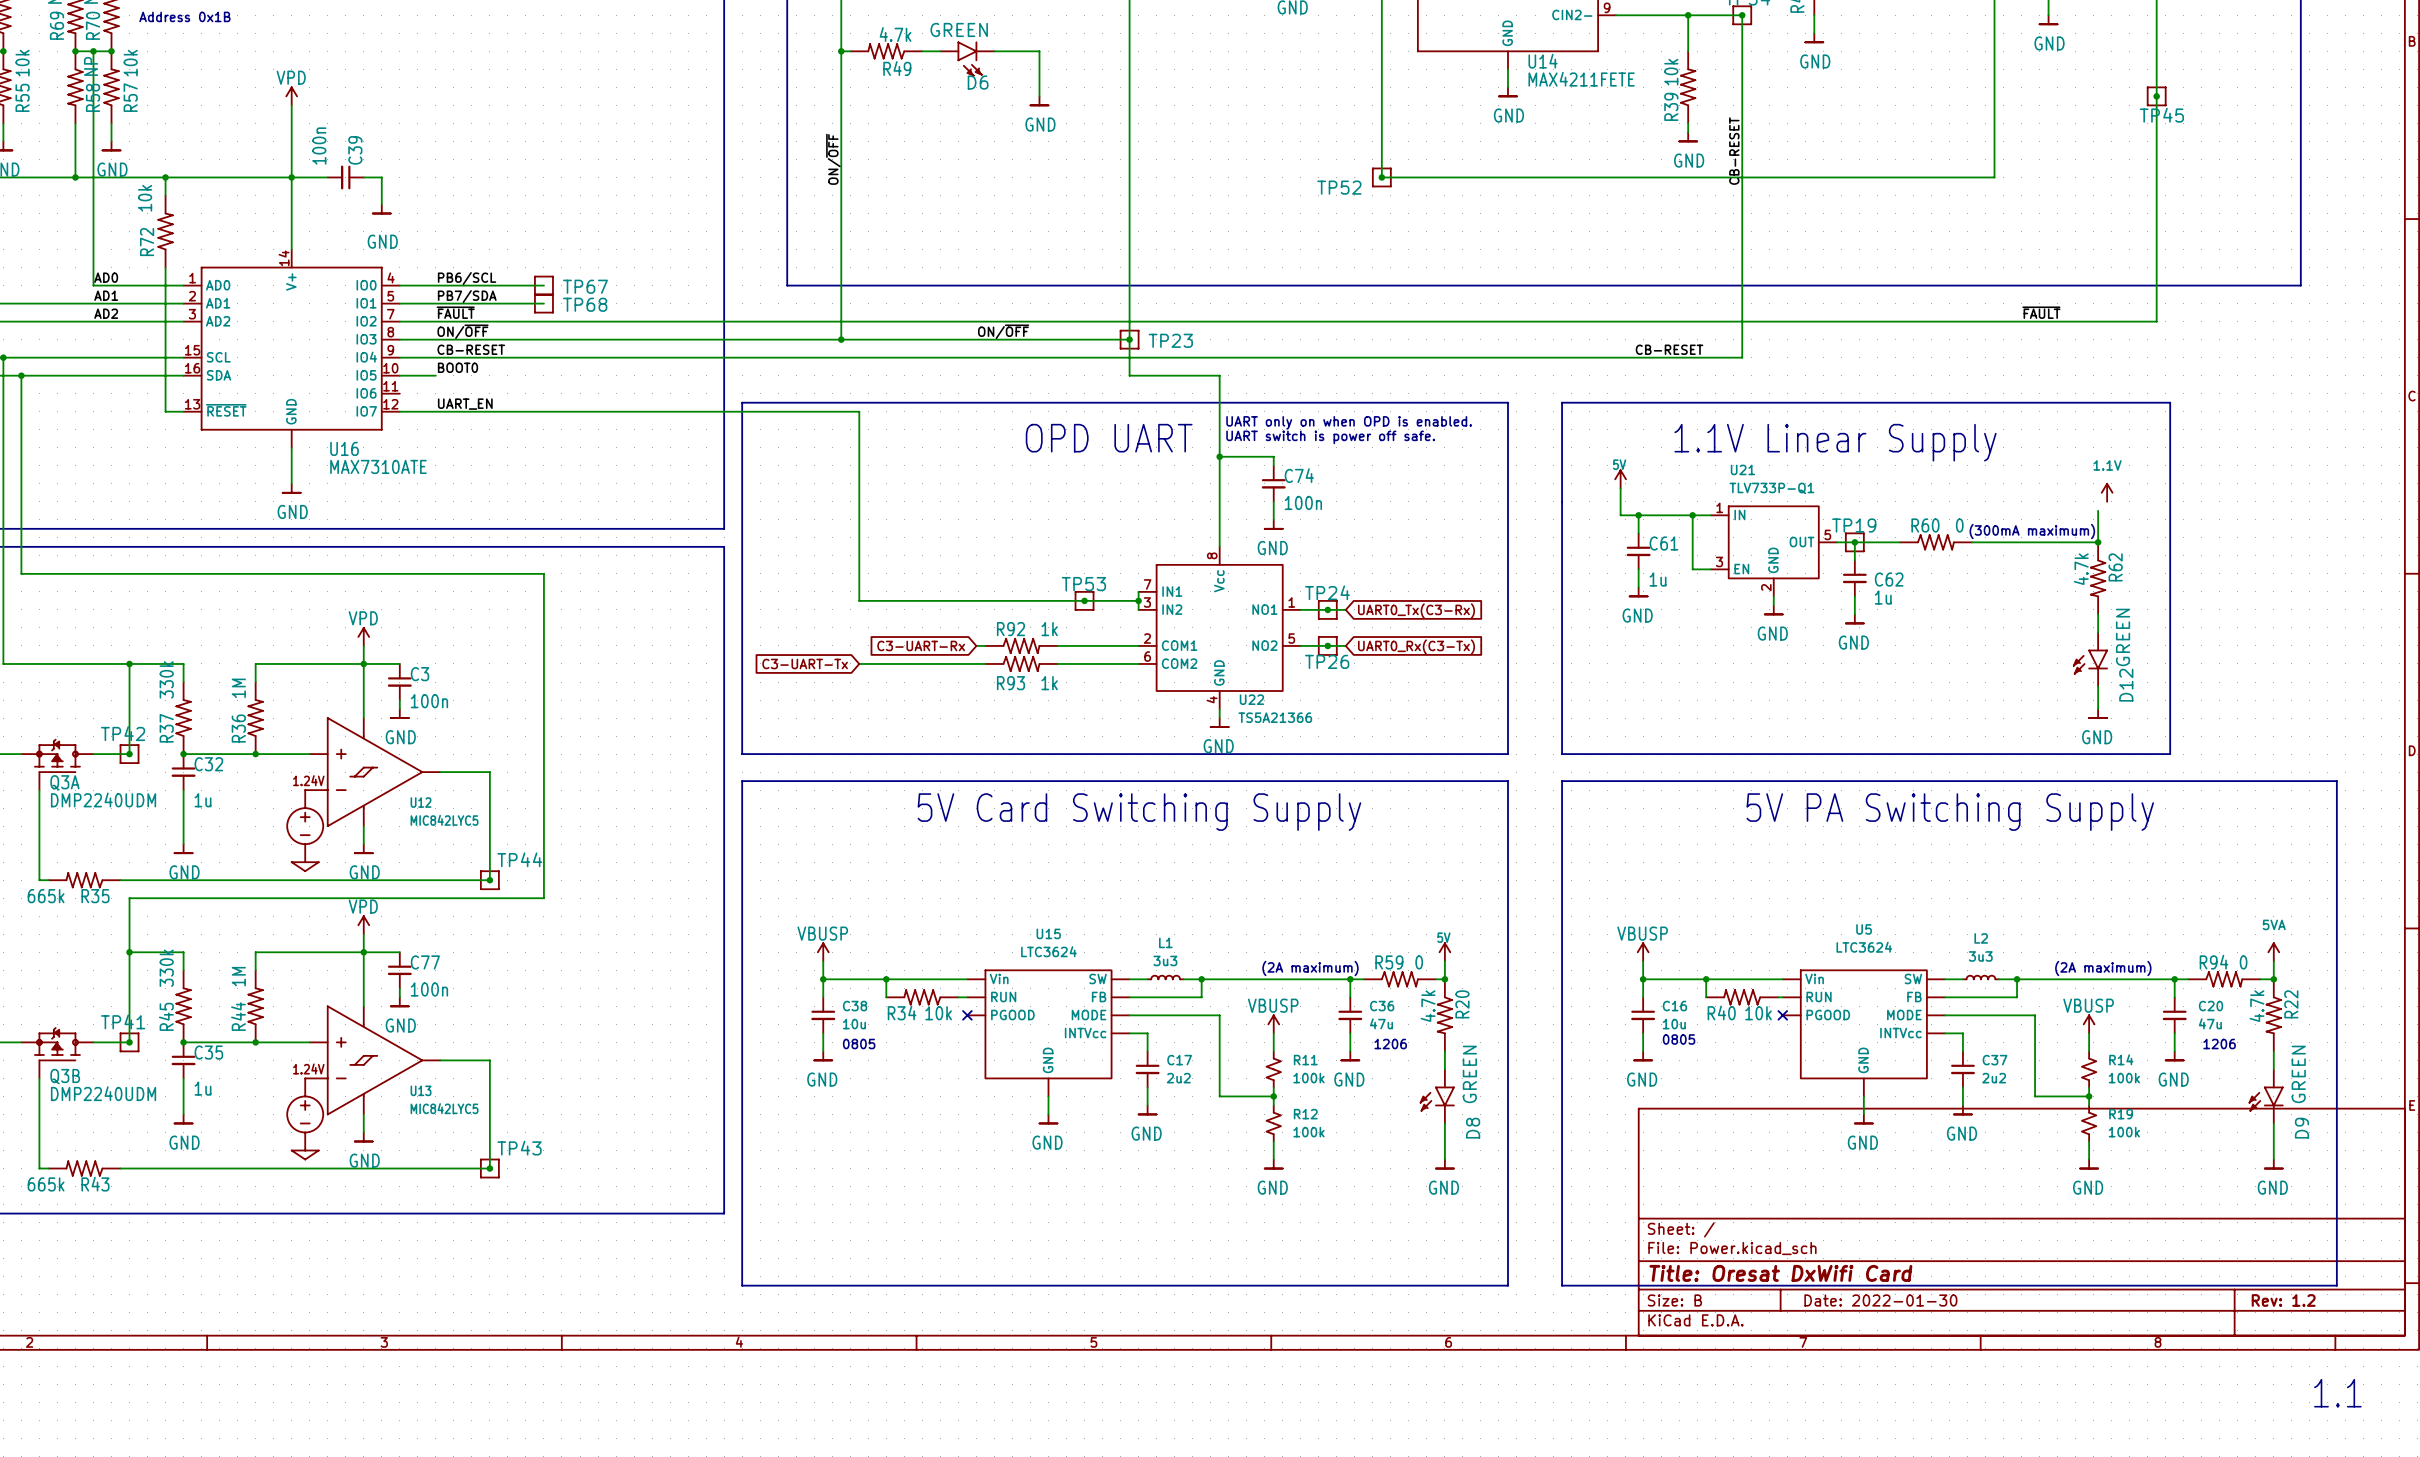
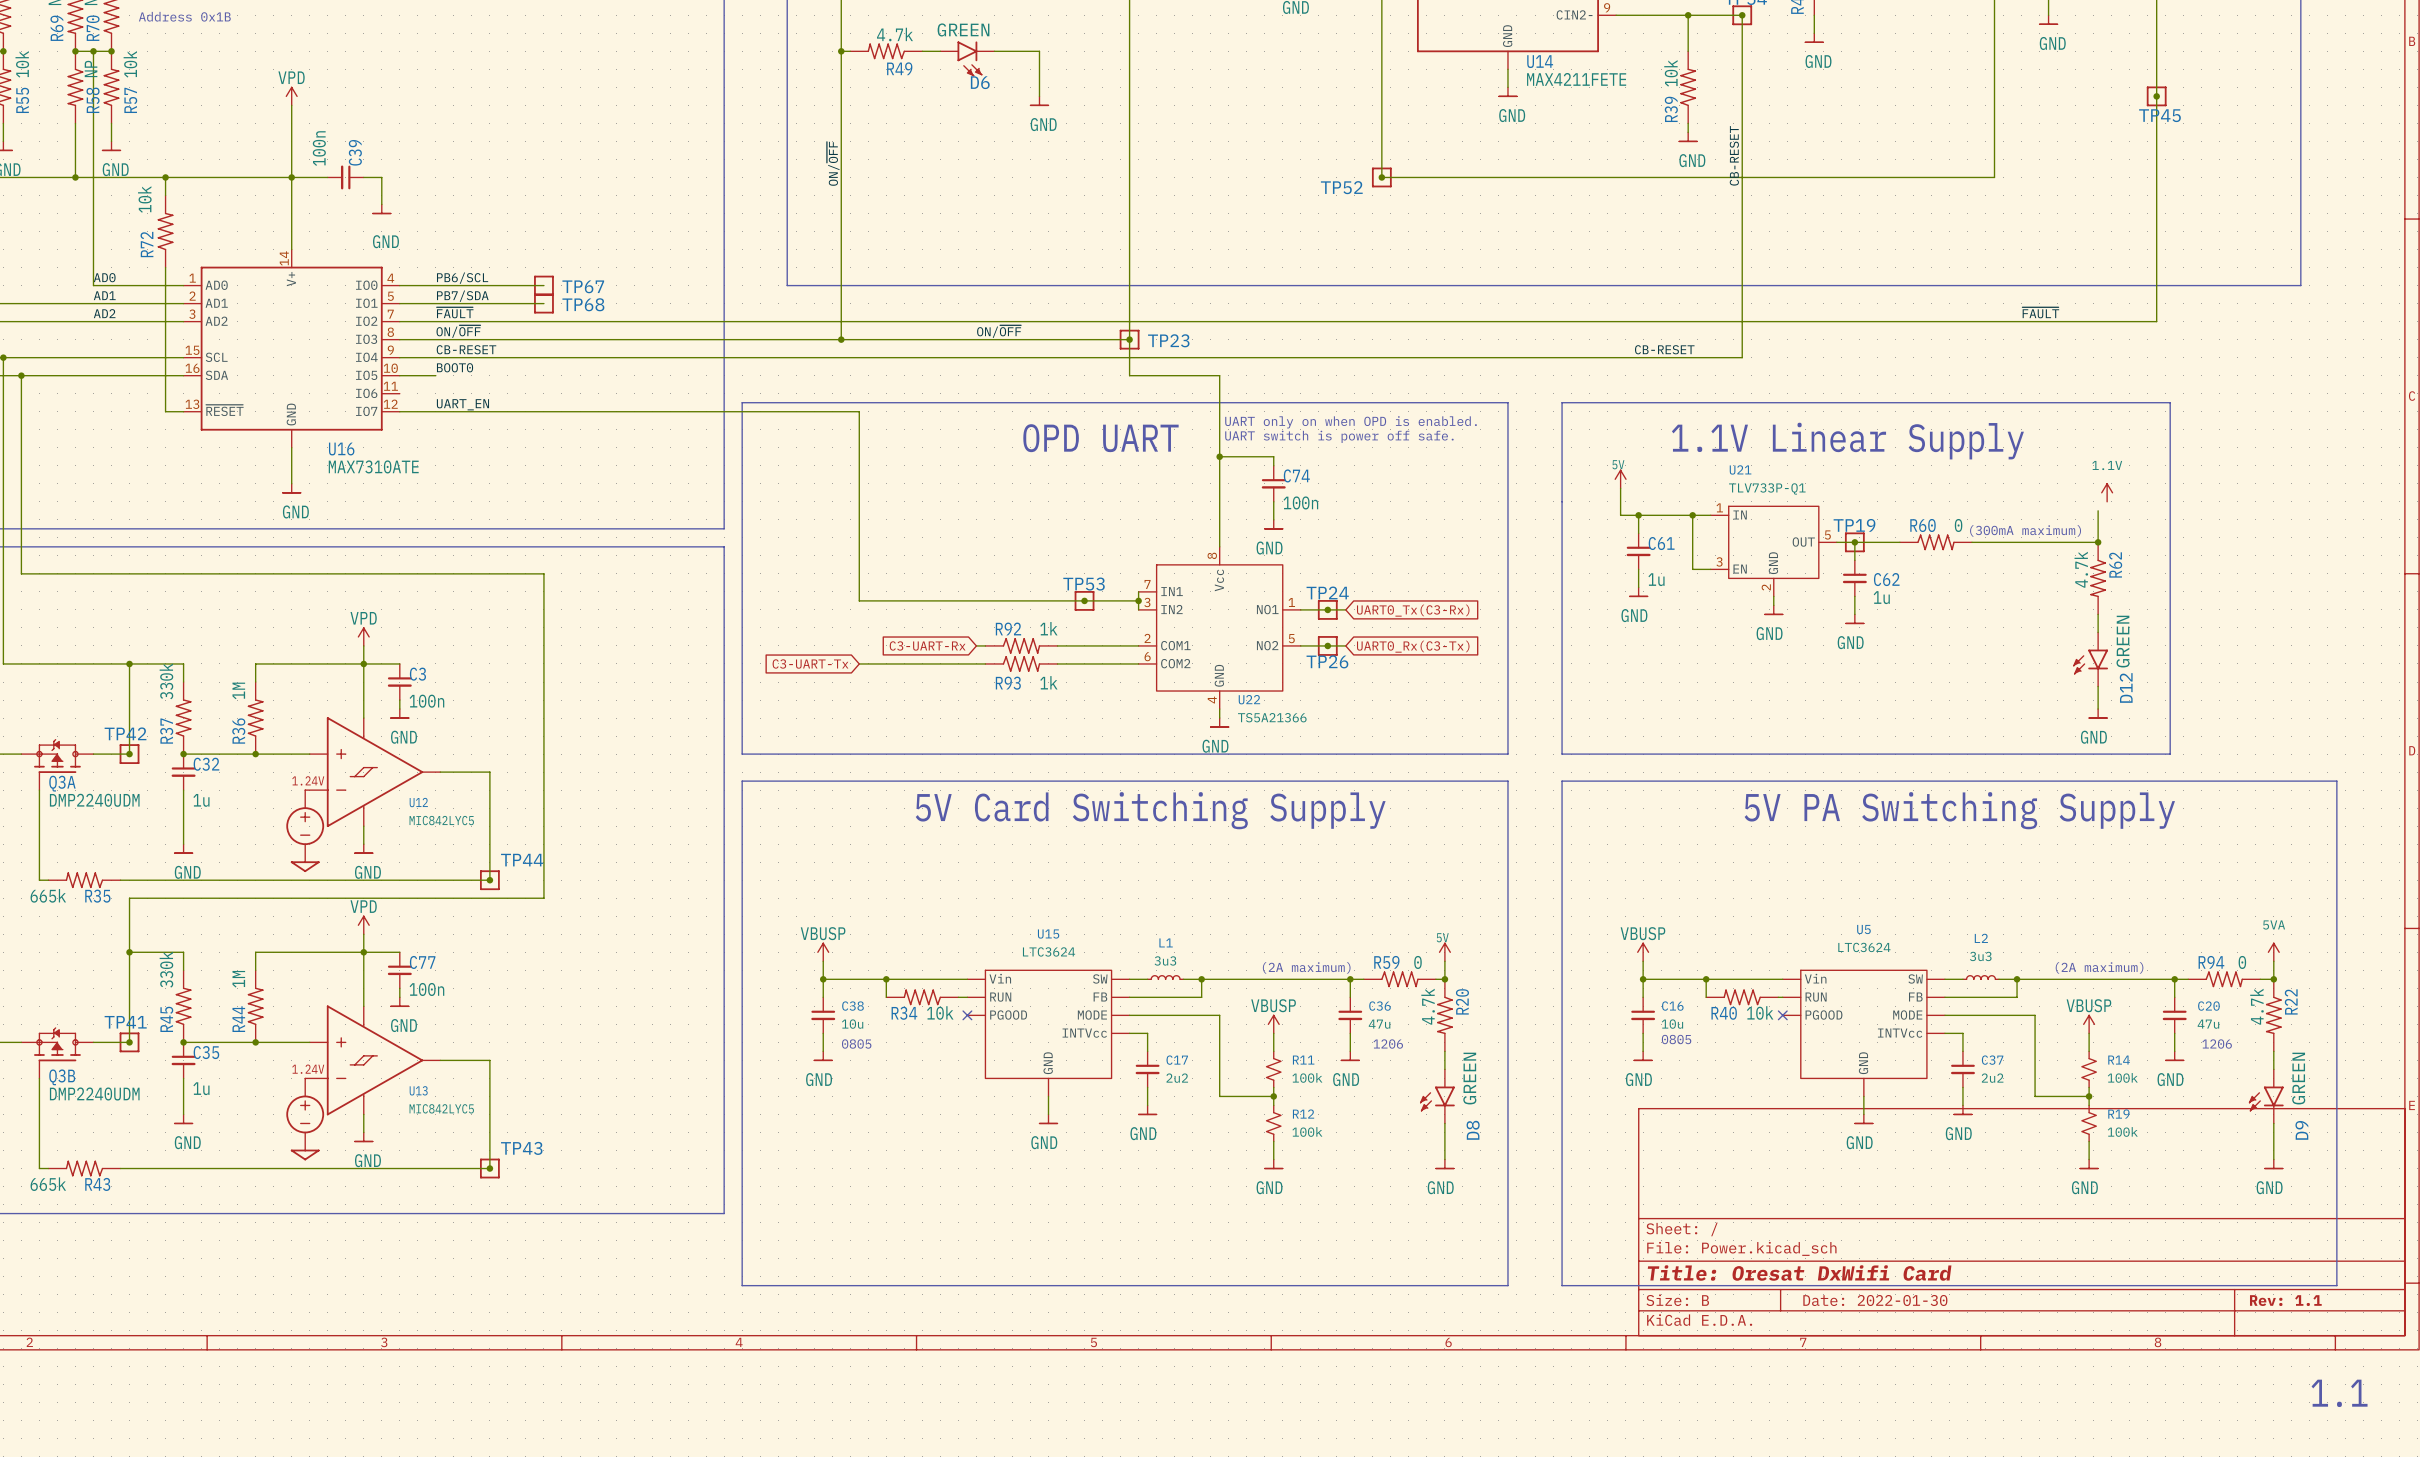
title block: Rev: 1.2 (2283, 1300) -> Rev: 1.1 (2285, 1300)

